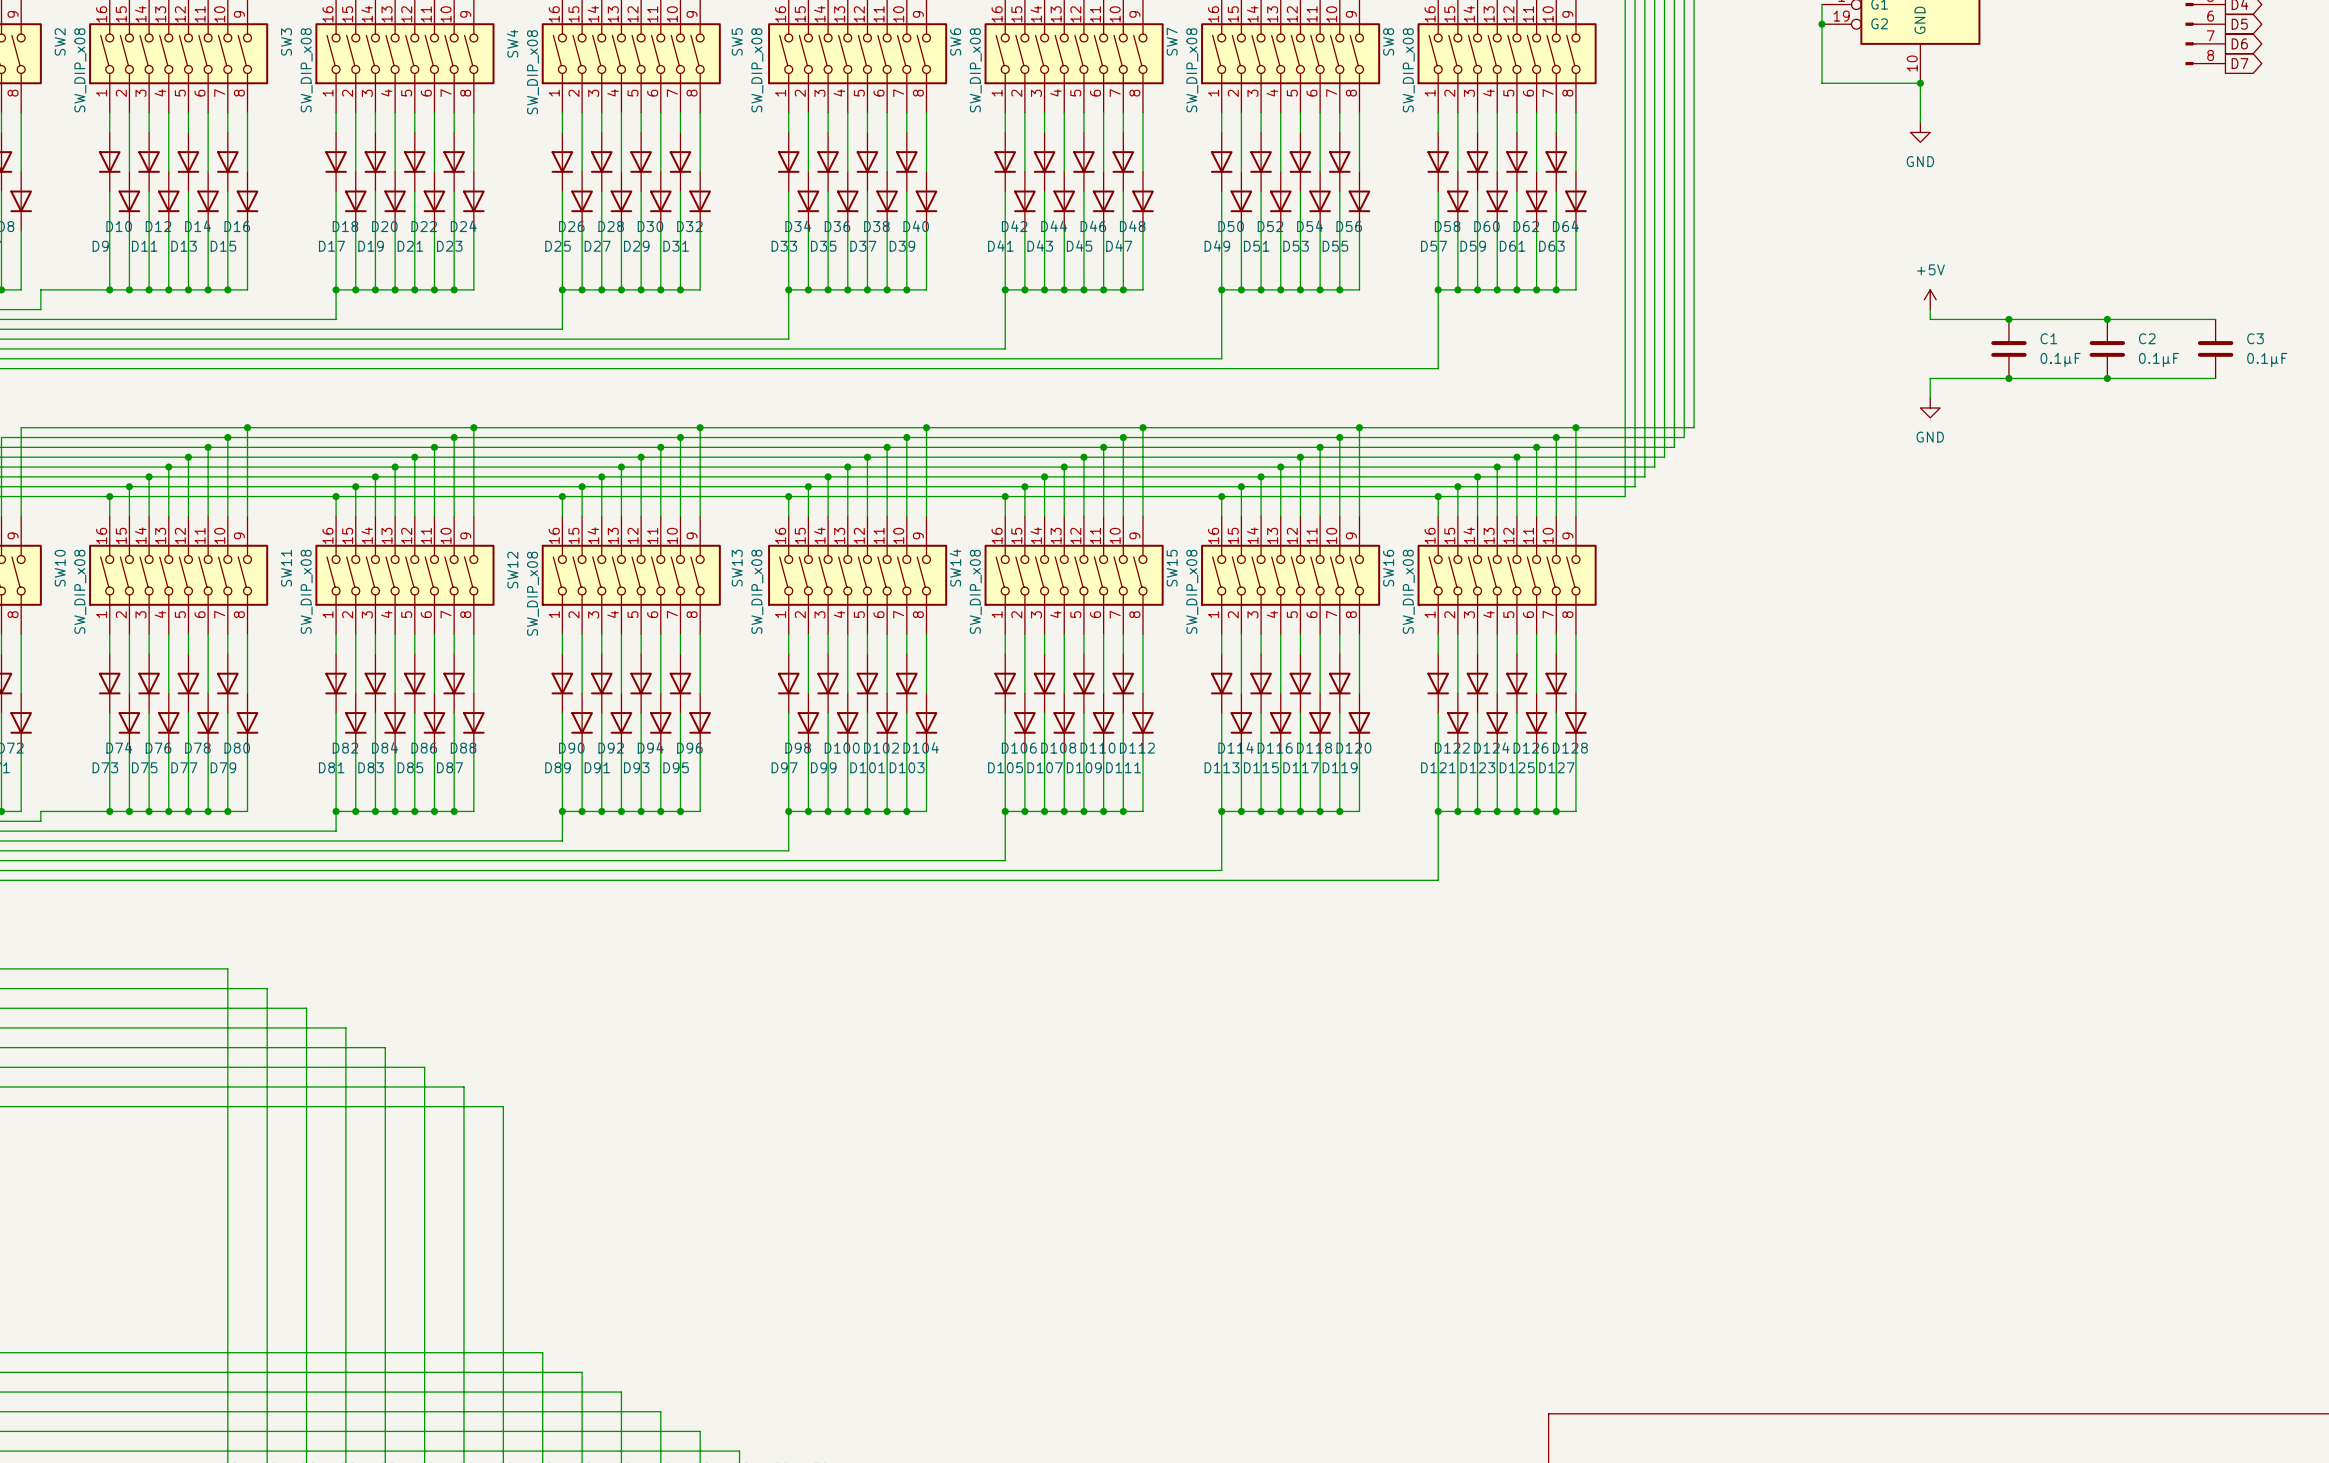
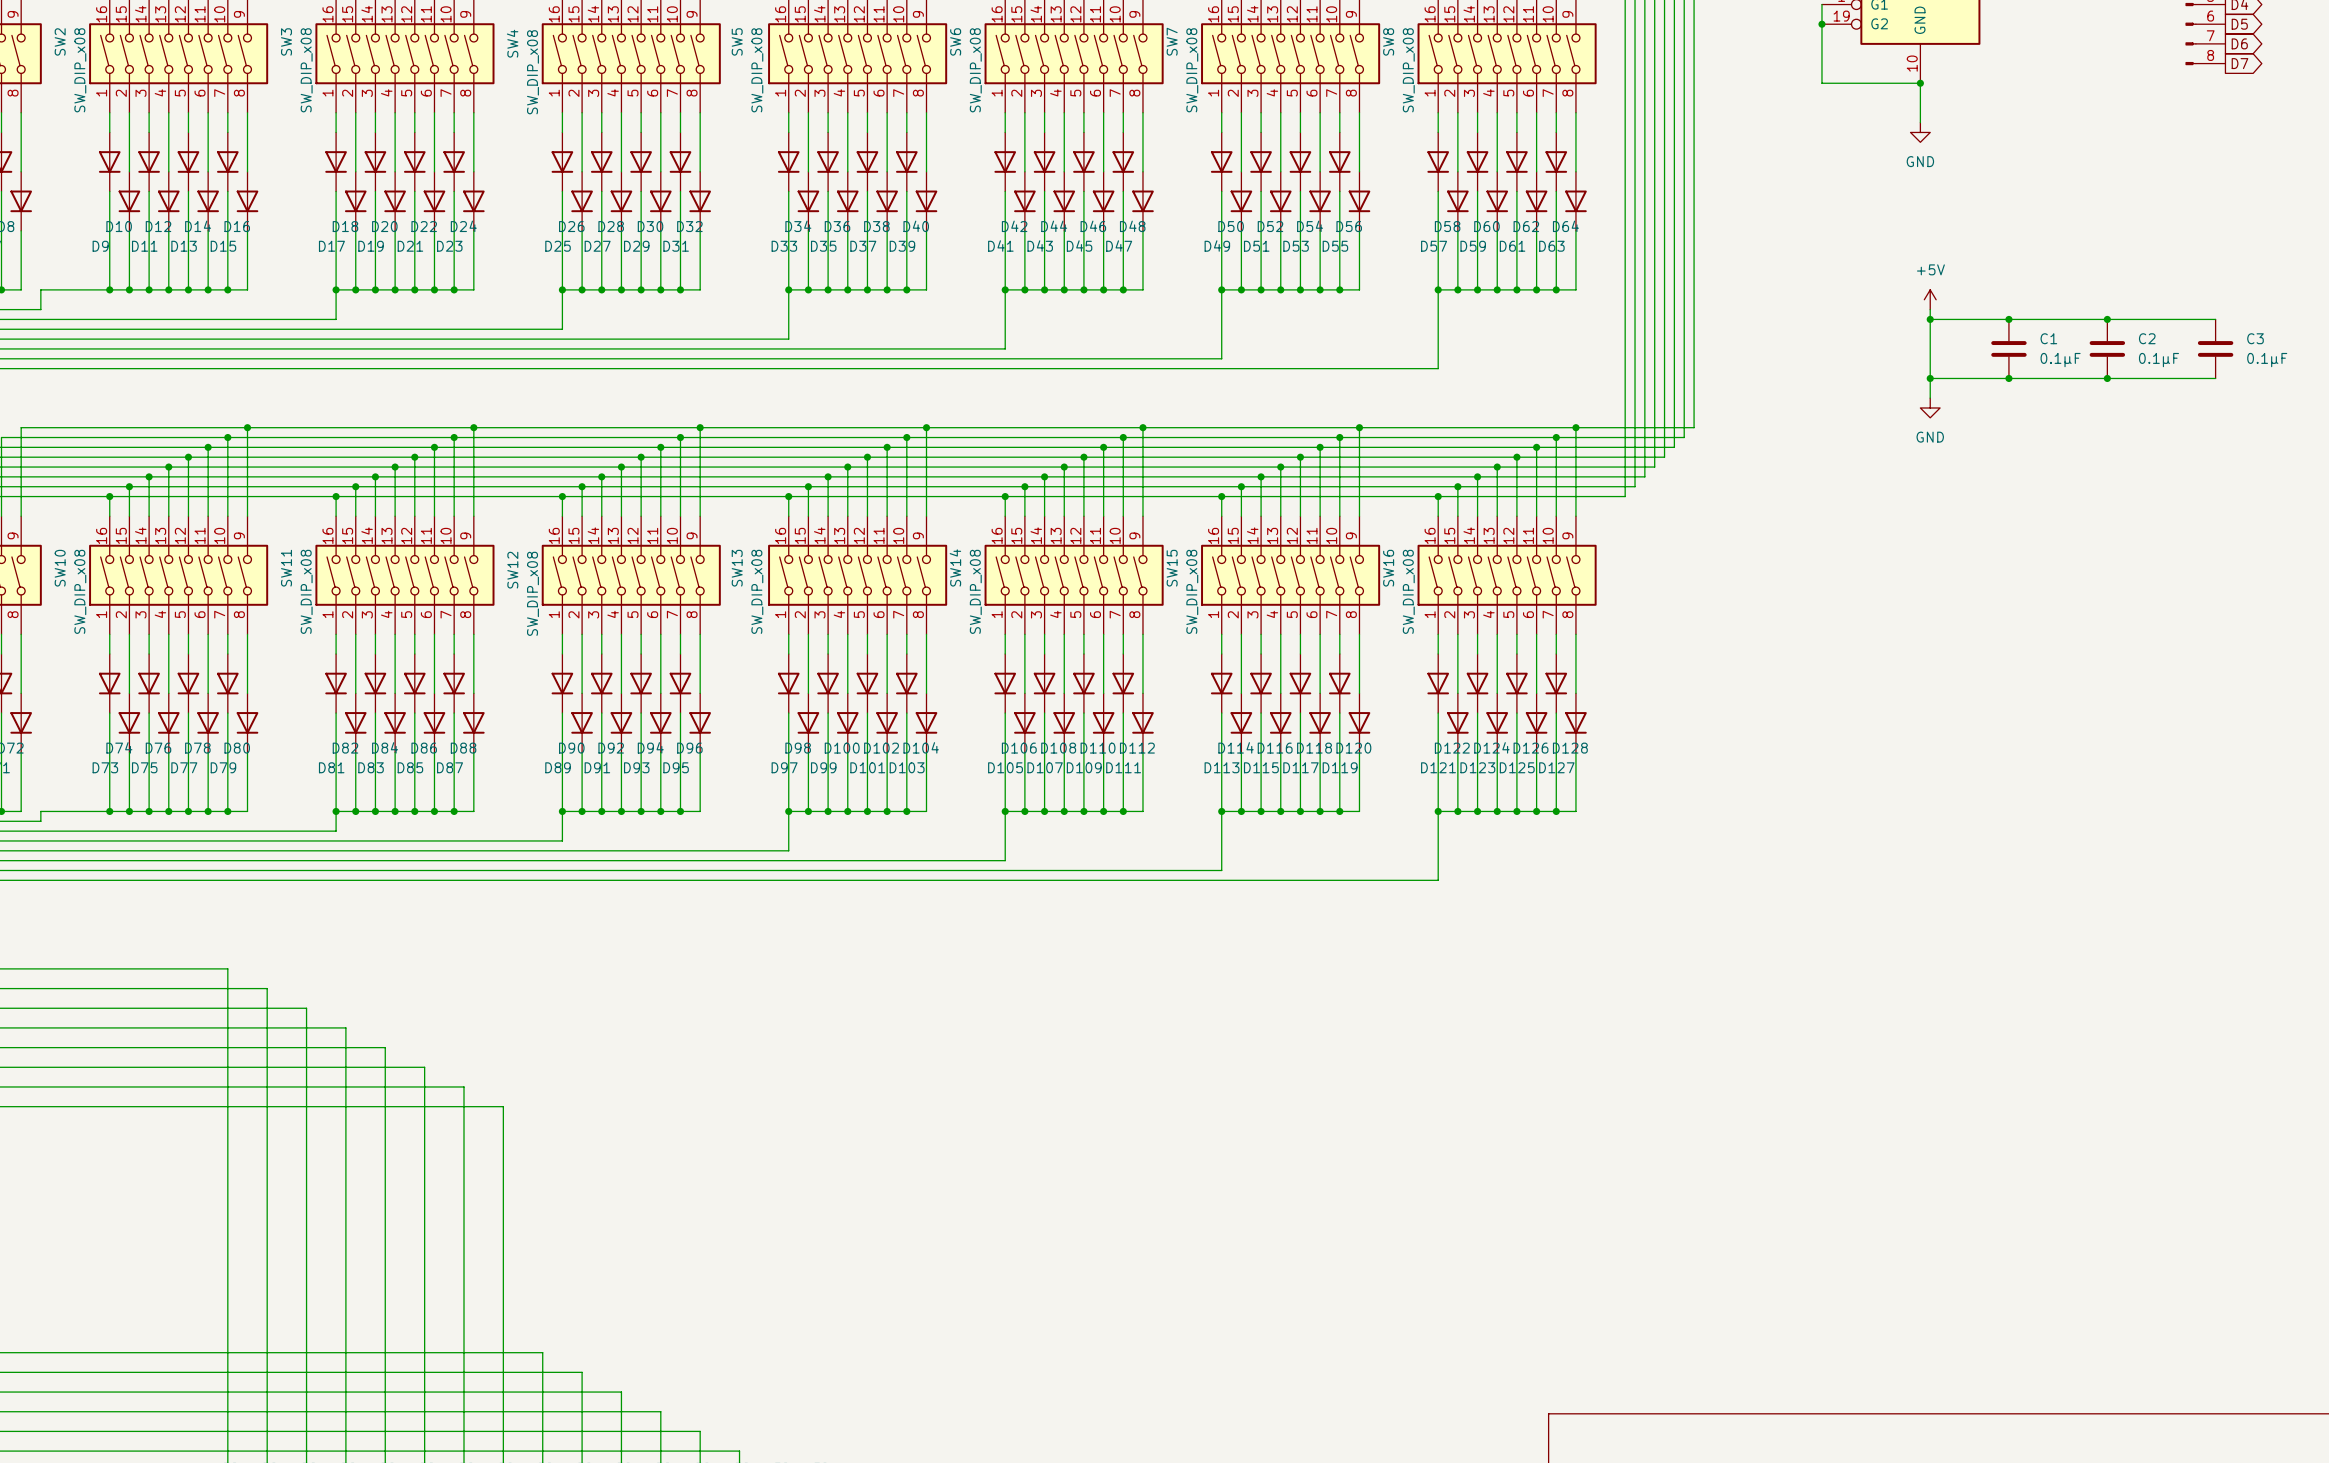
wire: none -> (1930, 319) (1930, 378)
junction: none -> (1930, 319)
junction: none -> (1930, 378)

